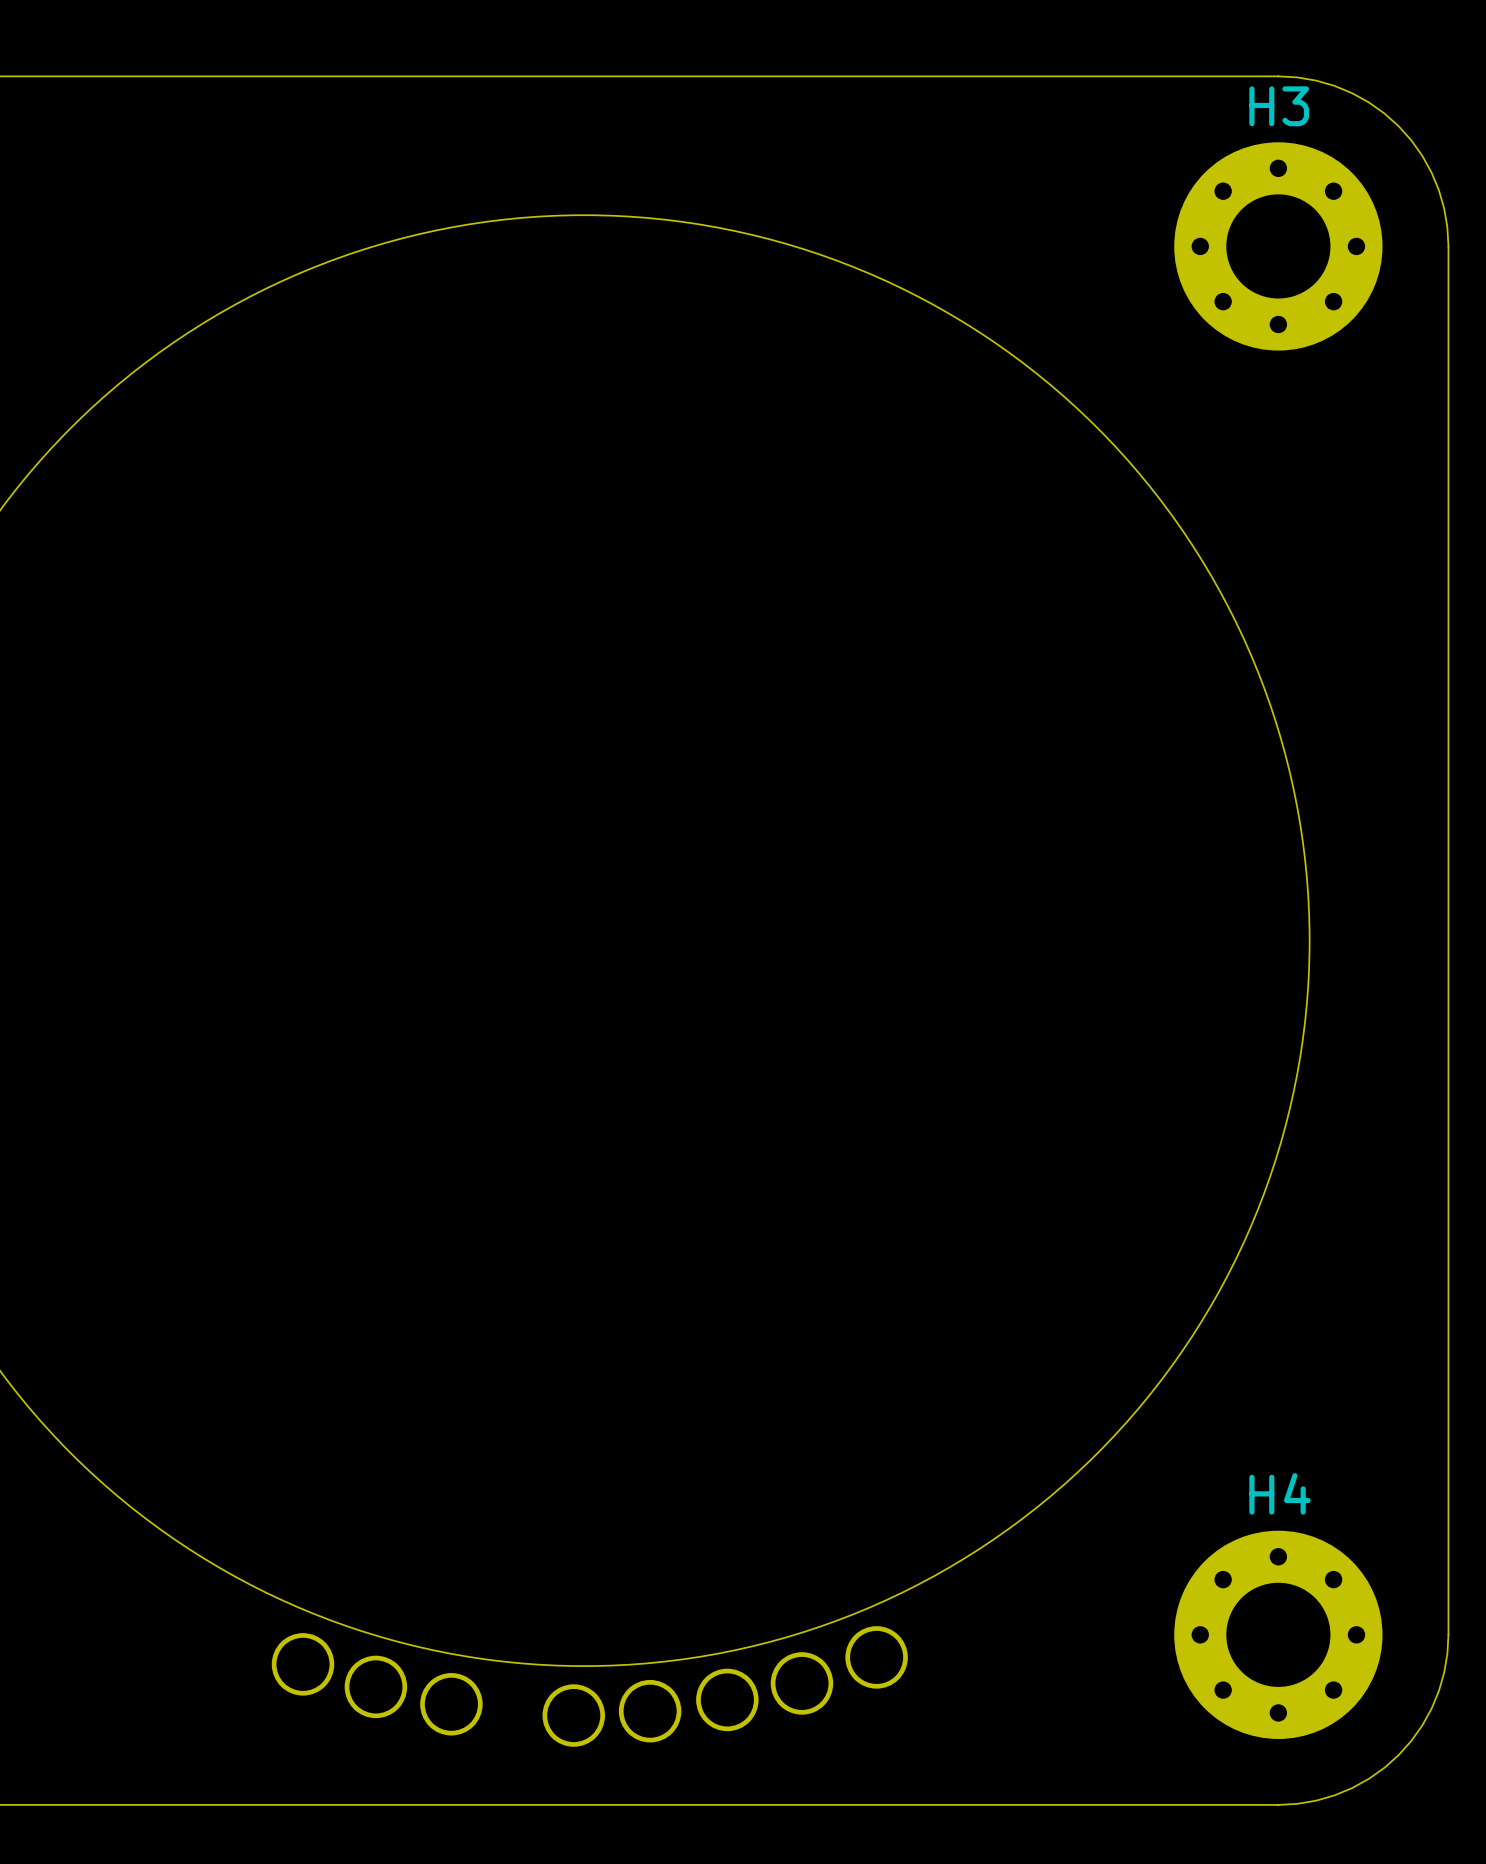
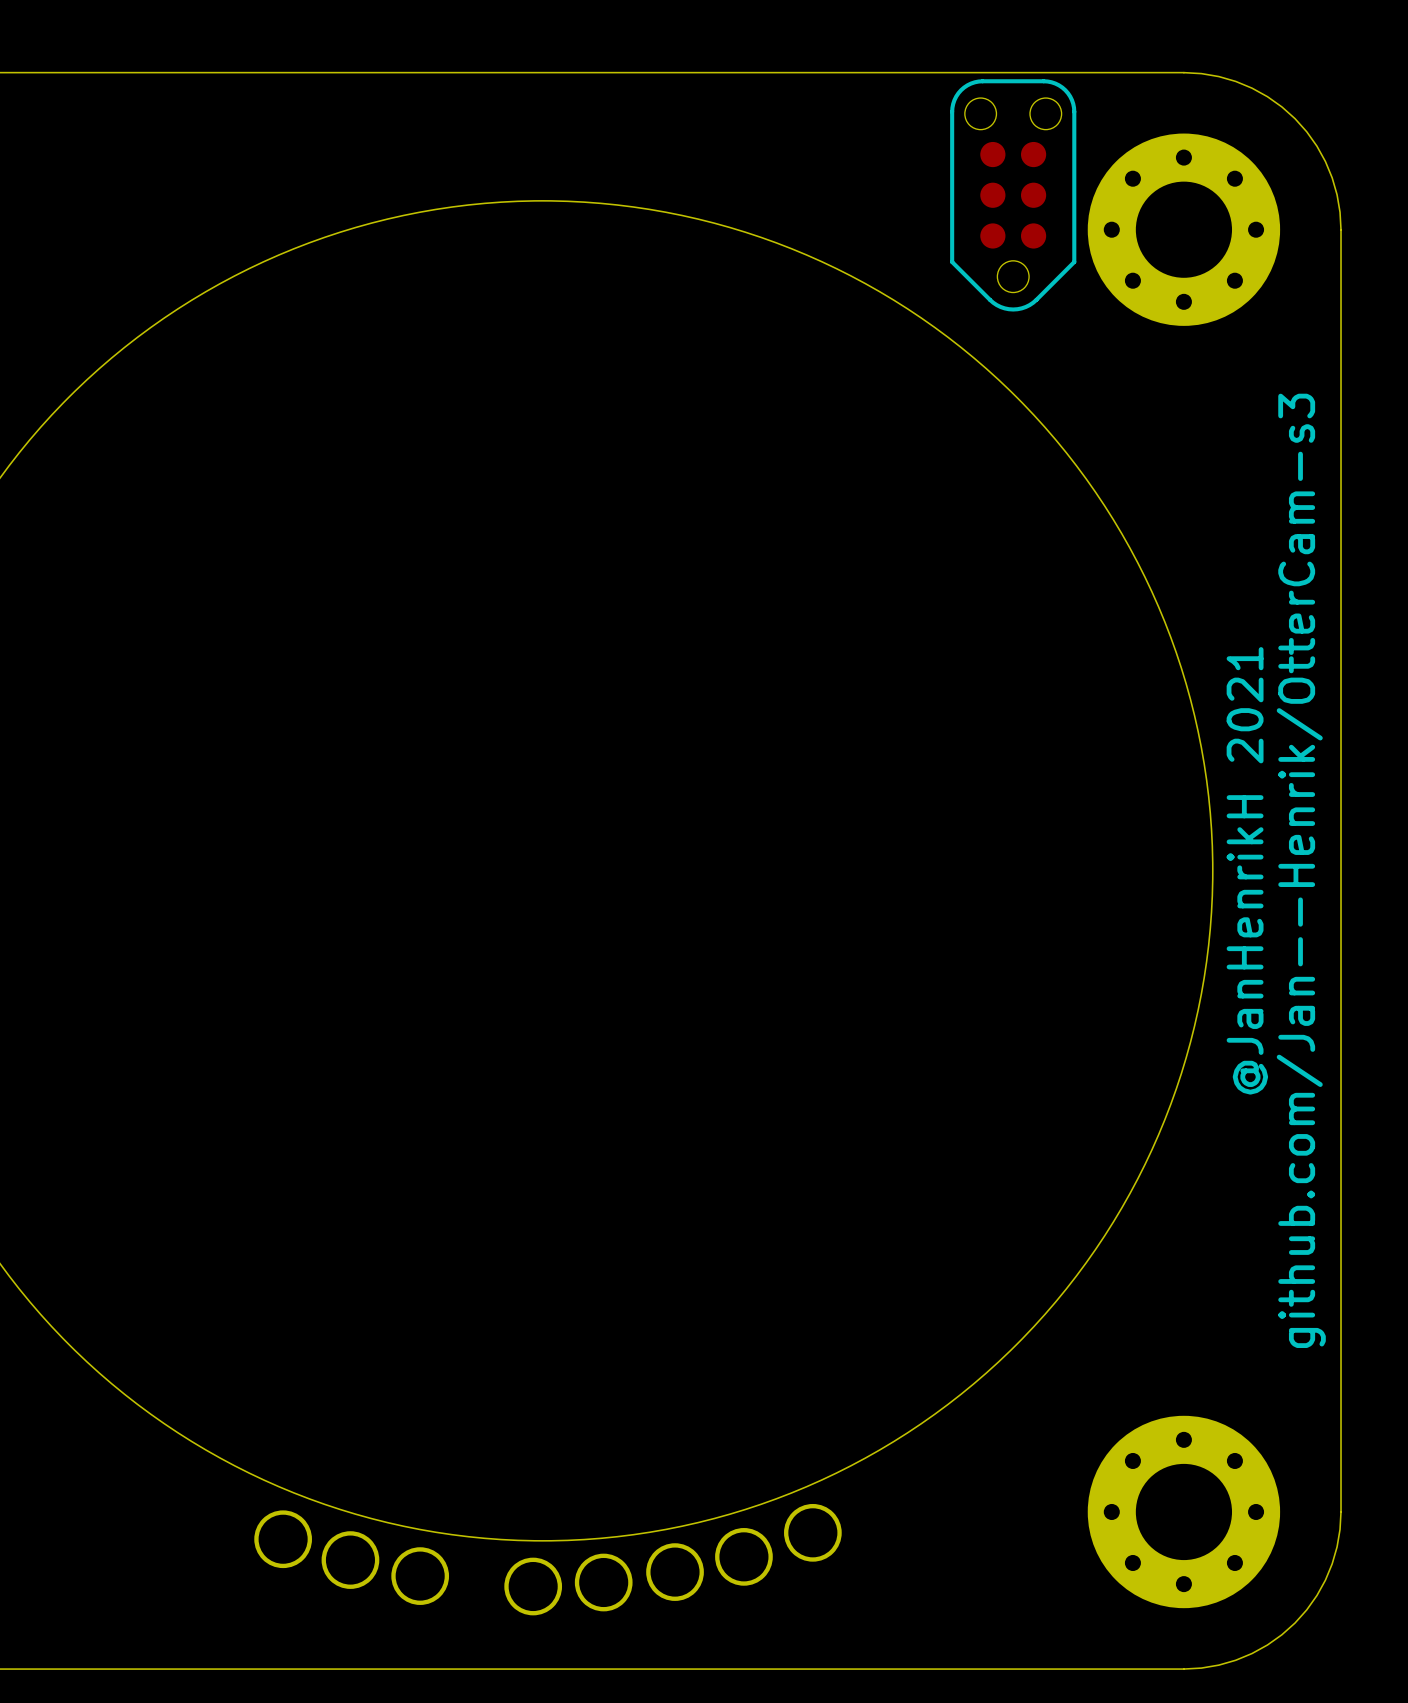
H3 name: H3 (1279, 106) -> none
part: none -> (1013, 195)
text: none -> @JanHenrikH 2021 (1247, 870)
text: none -> github.com/Jan--Henrik/OtterCam-s3 (1301, 870)
H4 name: H4 (1280, 1493) -> none

